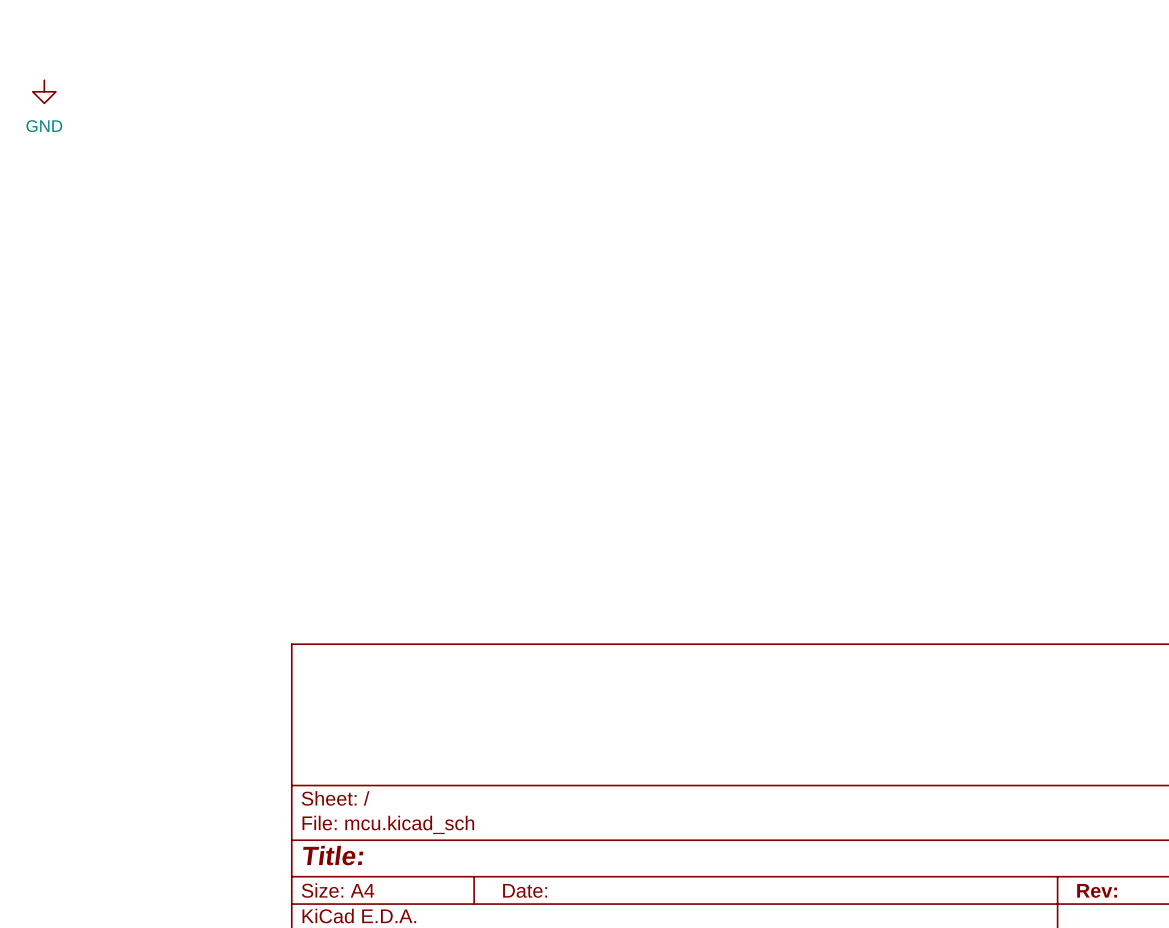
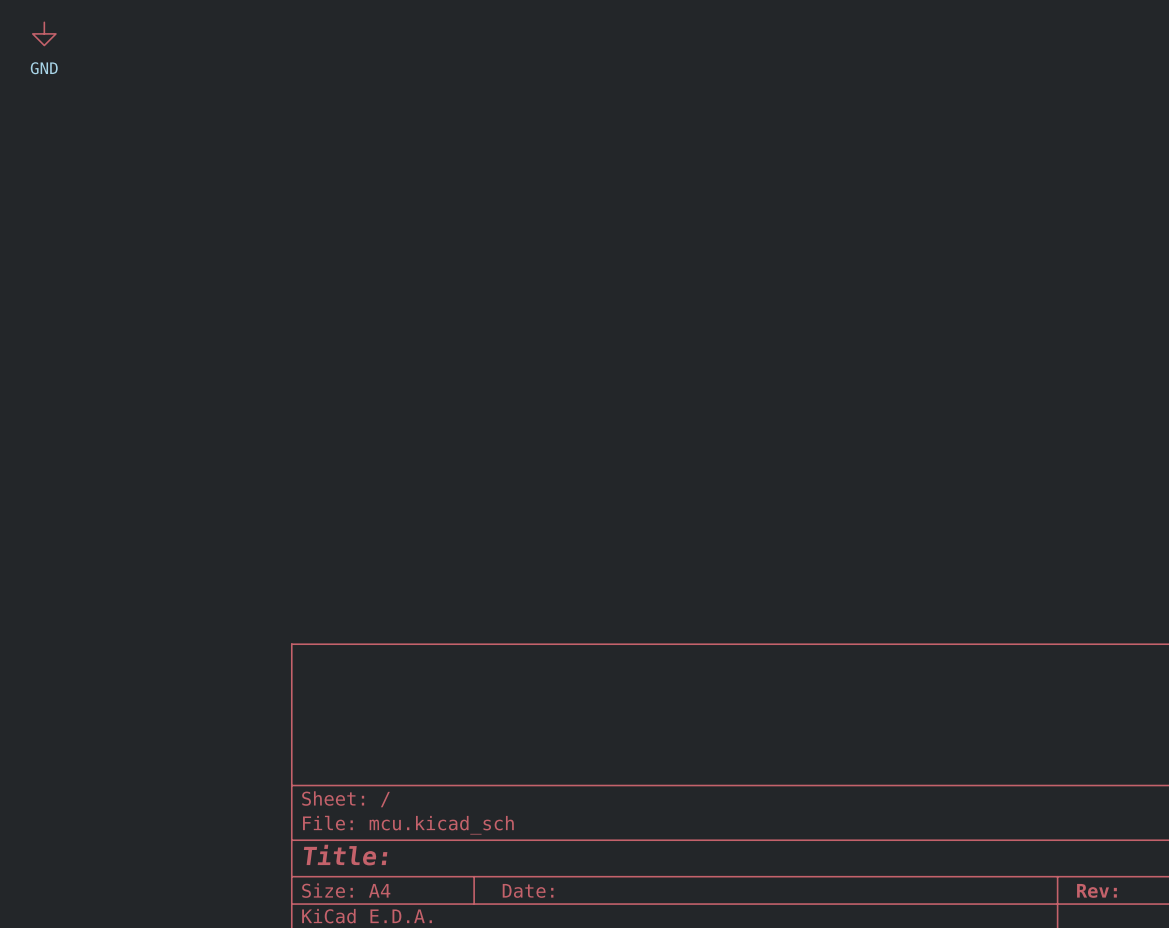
power symbol position: GND (44, 91) -> GND (44, 33)

